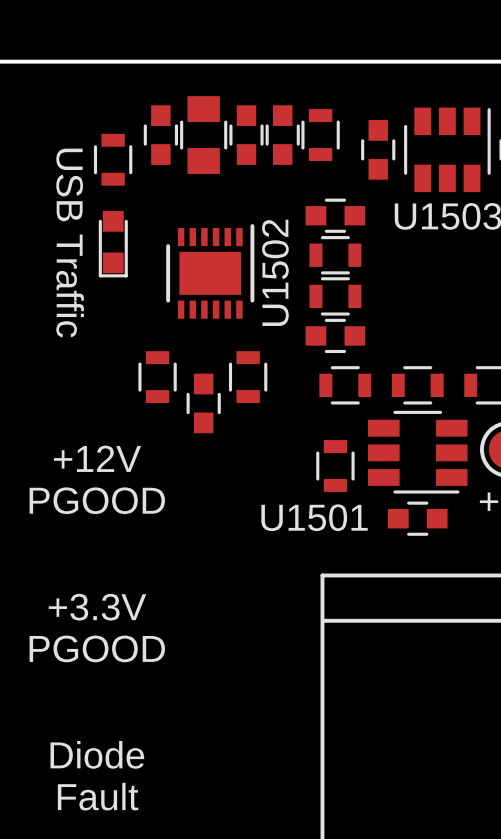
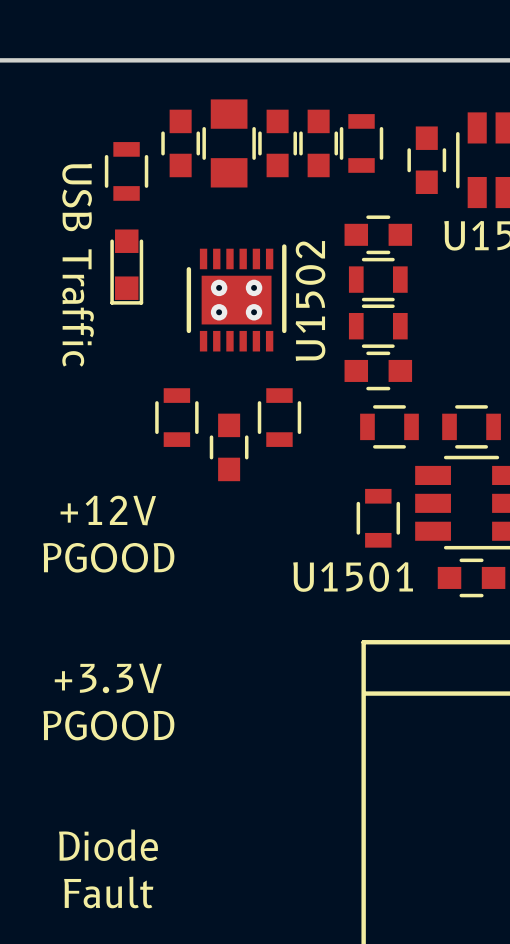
via: none -> (219, 287)
via: none -> (254, 287)
via: none -> (219, 312)
via: none -> (254, 312)

